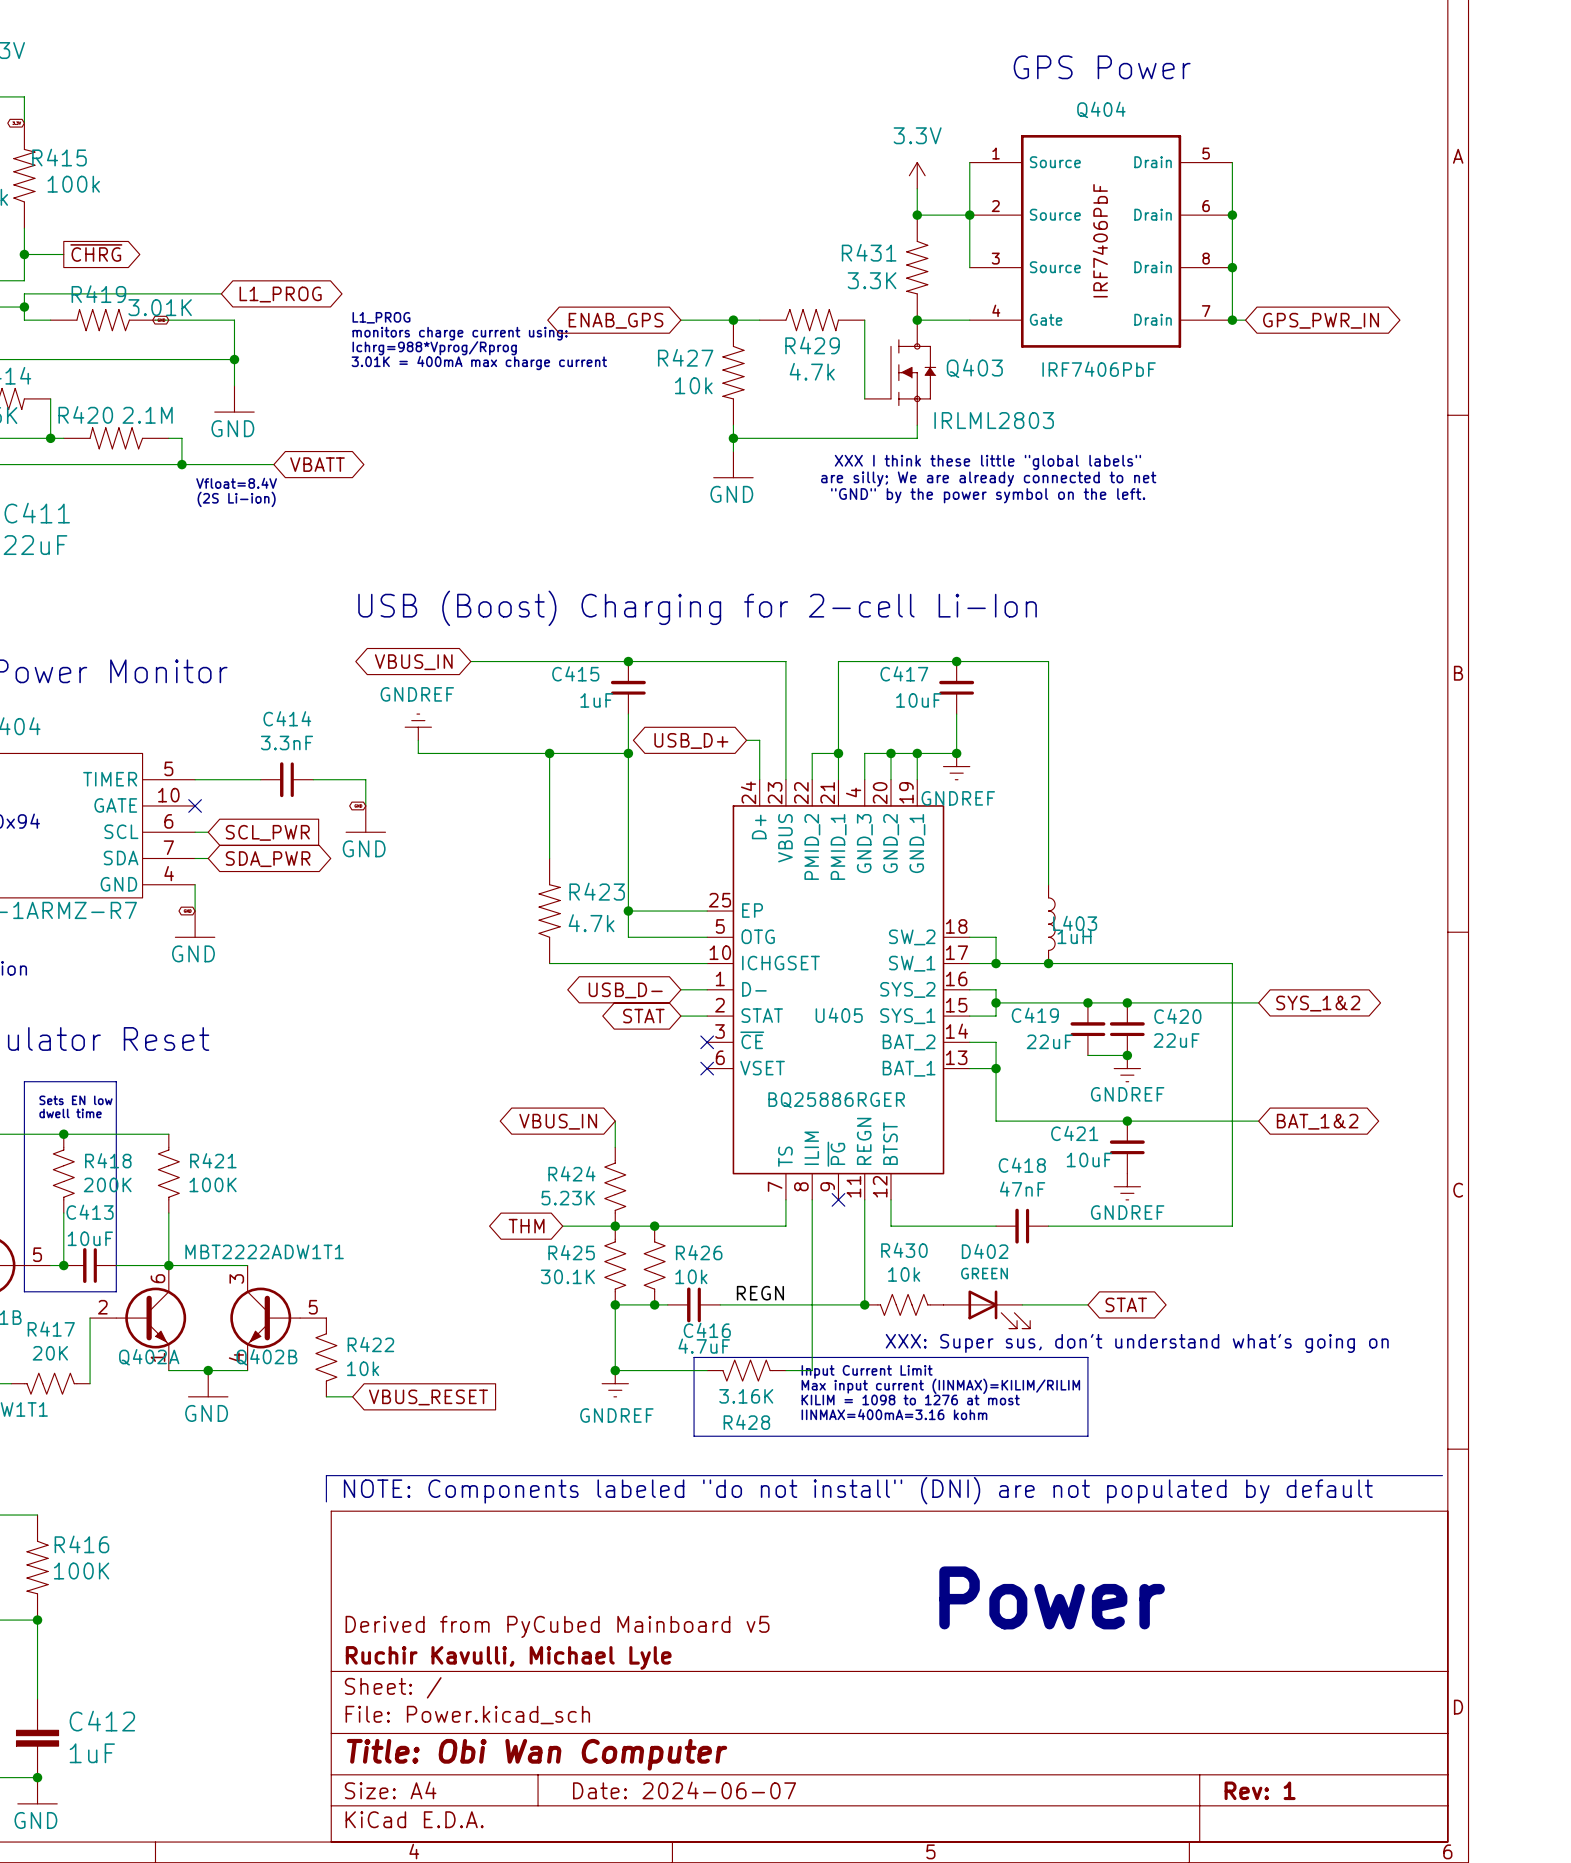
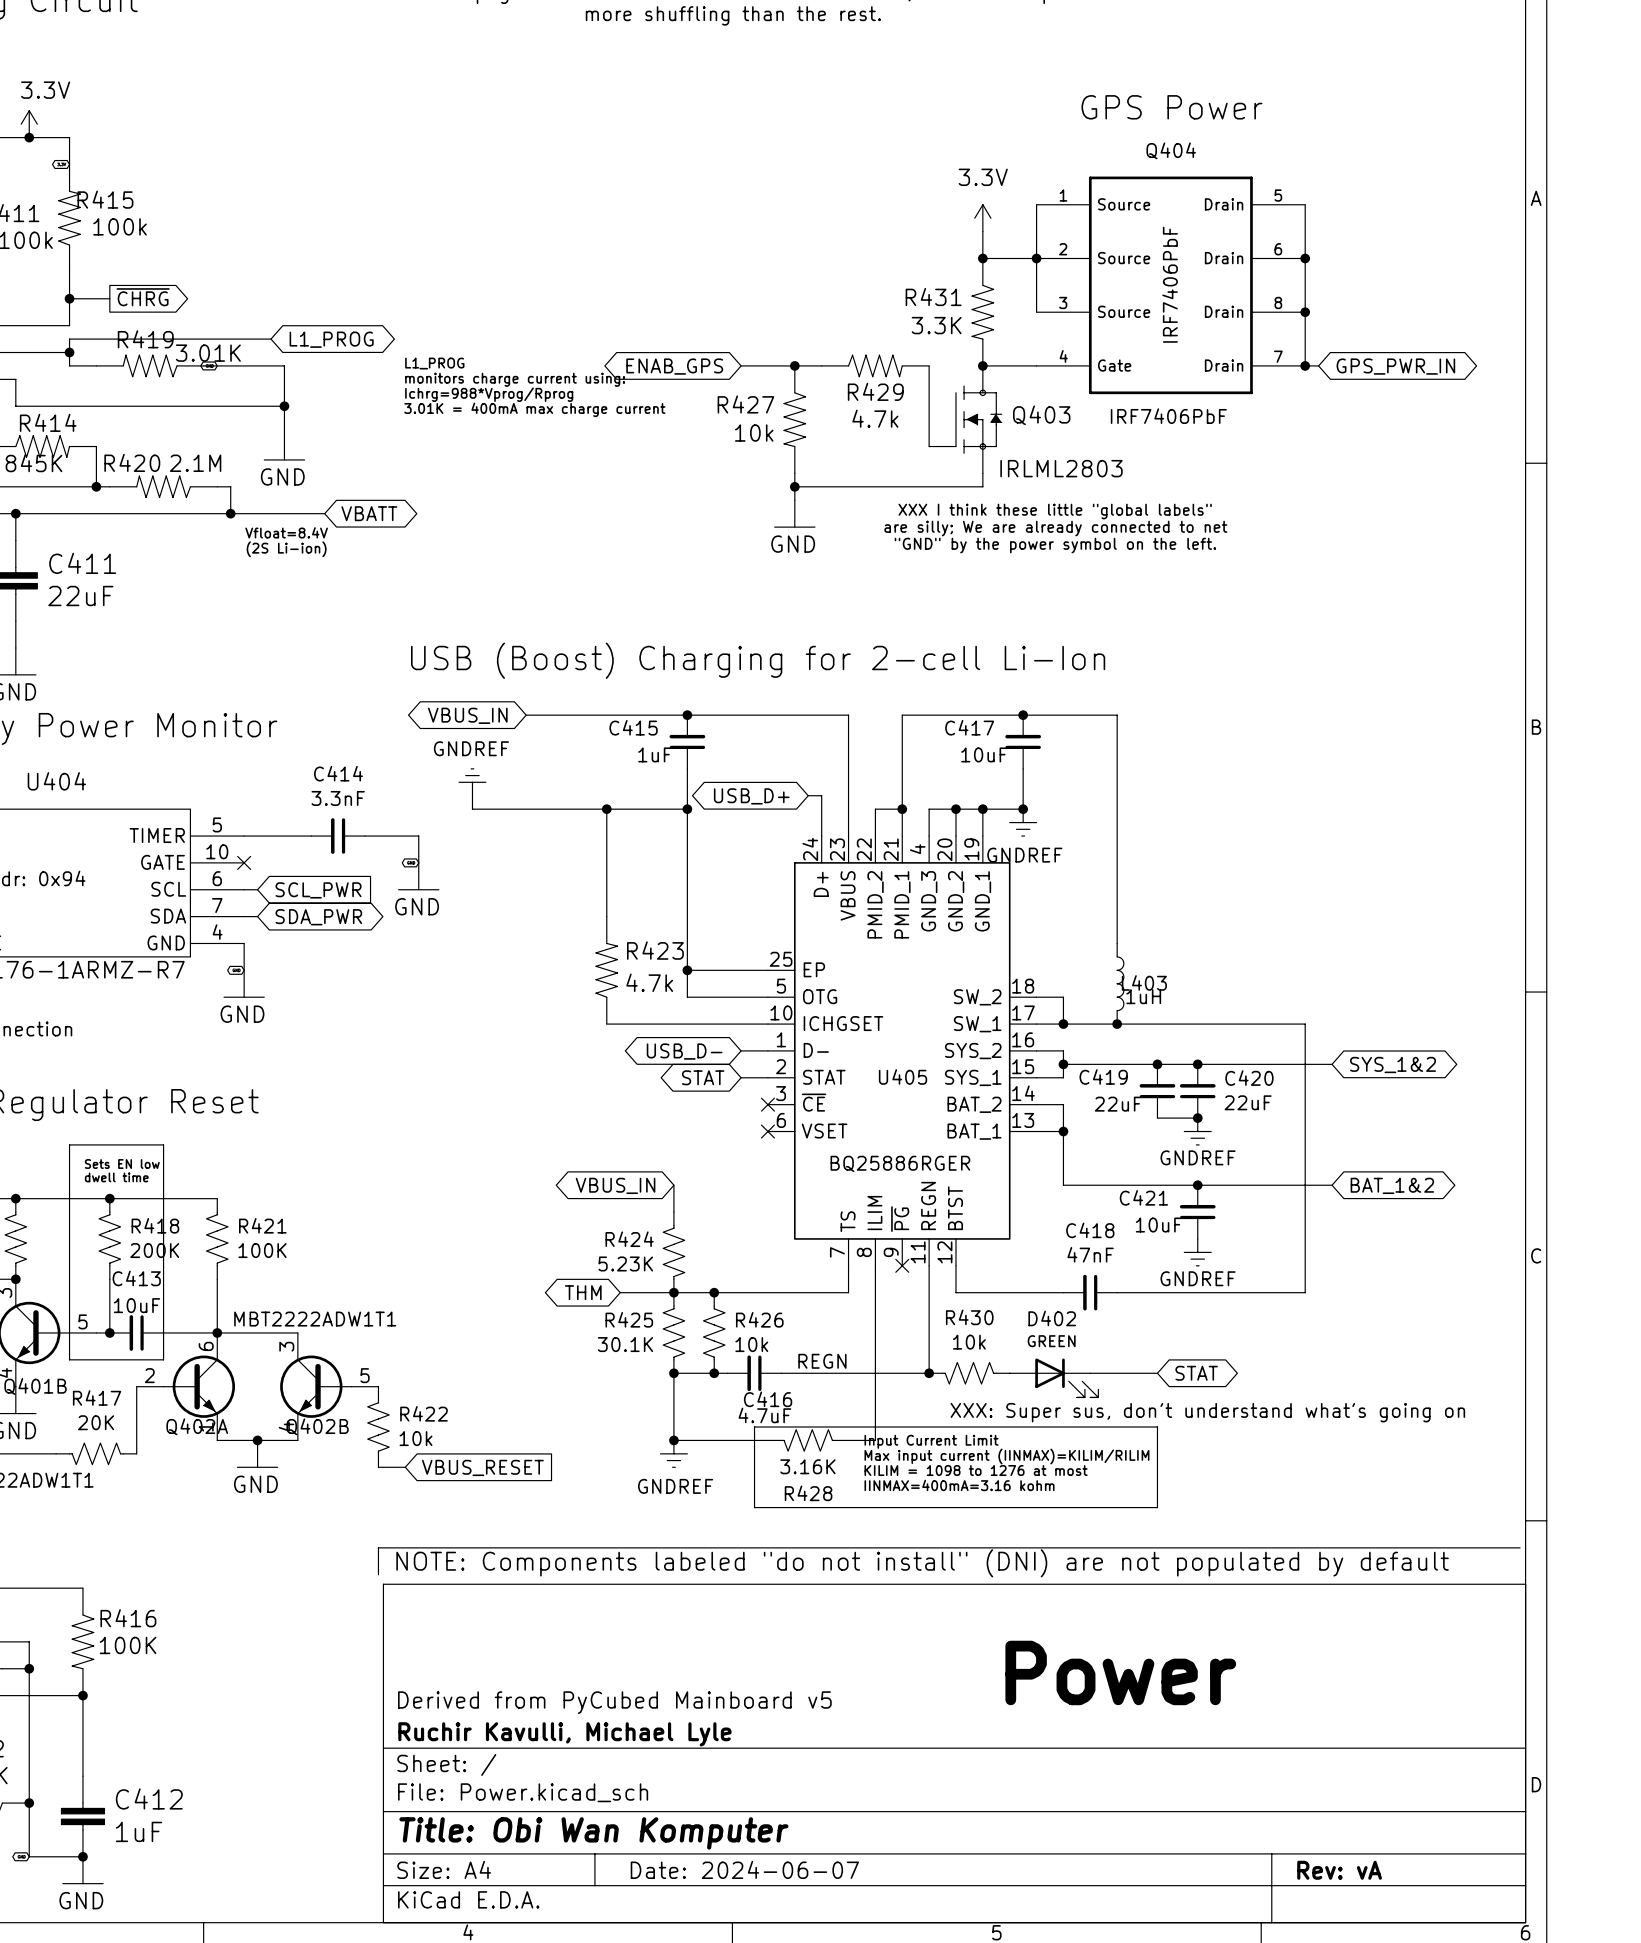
title block: Title: Obi Wan Computer (536, 1754) -> Title: Obi Wan Komputer (593, 1833)
title block: Rev: 1 (1260, 1790) -> Rev: vA (1339, 1870)

